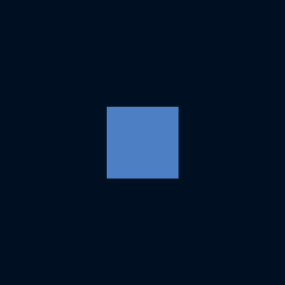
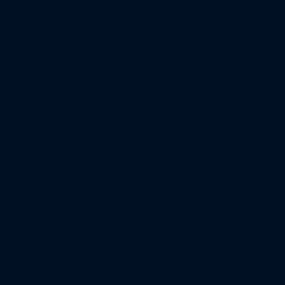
part: (142, 142) -> none

